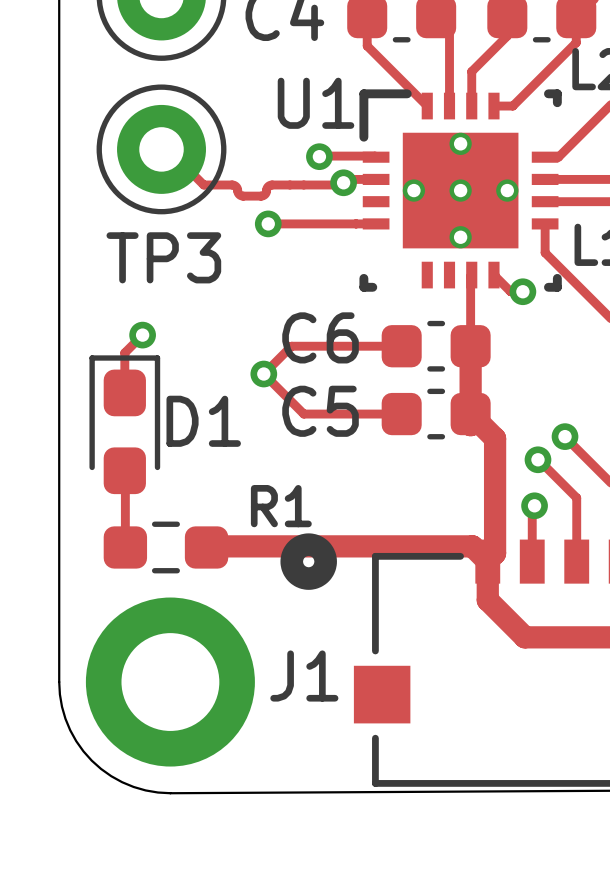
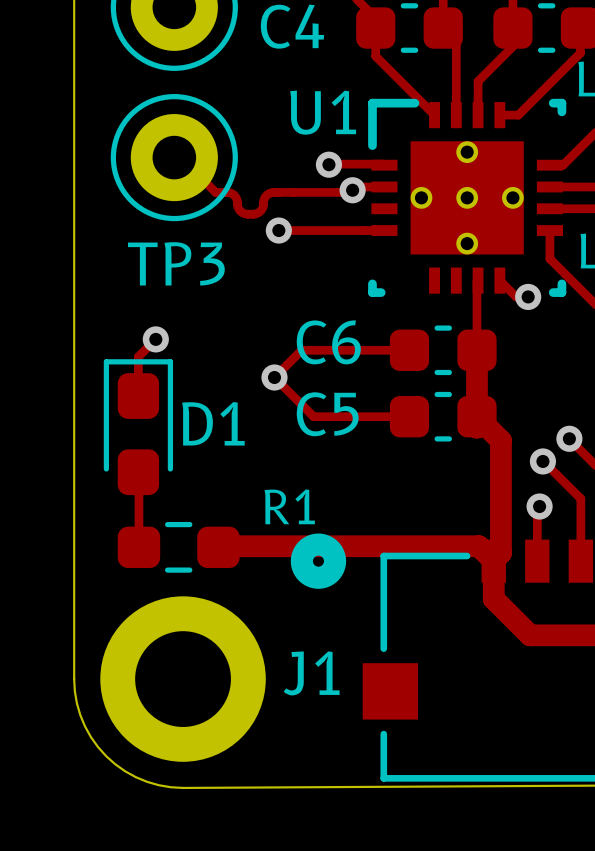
track: (215, 184) (234, 185) (238, 193) (243, 196) (263, 195) (267, 187) (272, 184) -> (263, 202) (265, 197) (269, 193) (282, 192)
track: none -> (226, 192) (234, 195) (237, 202)
track: none -> (237, 203) (240, 211) (247, 214) (258, 212) (263, 203)

